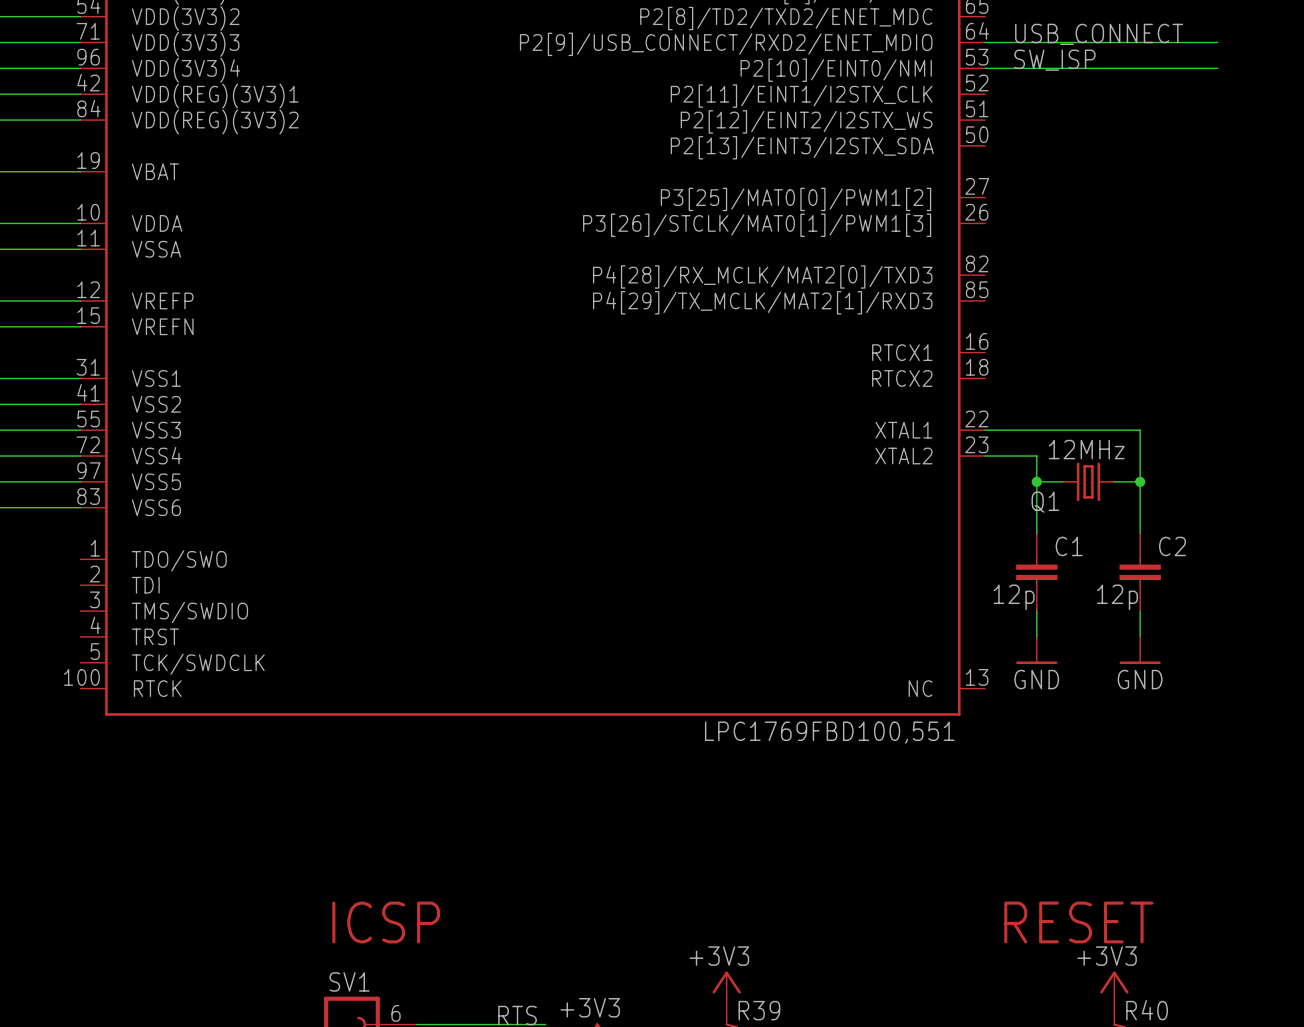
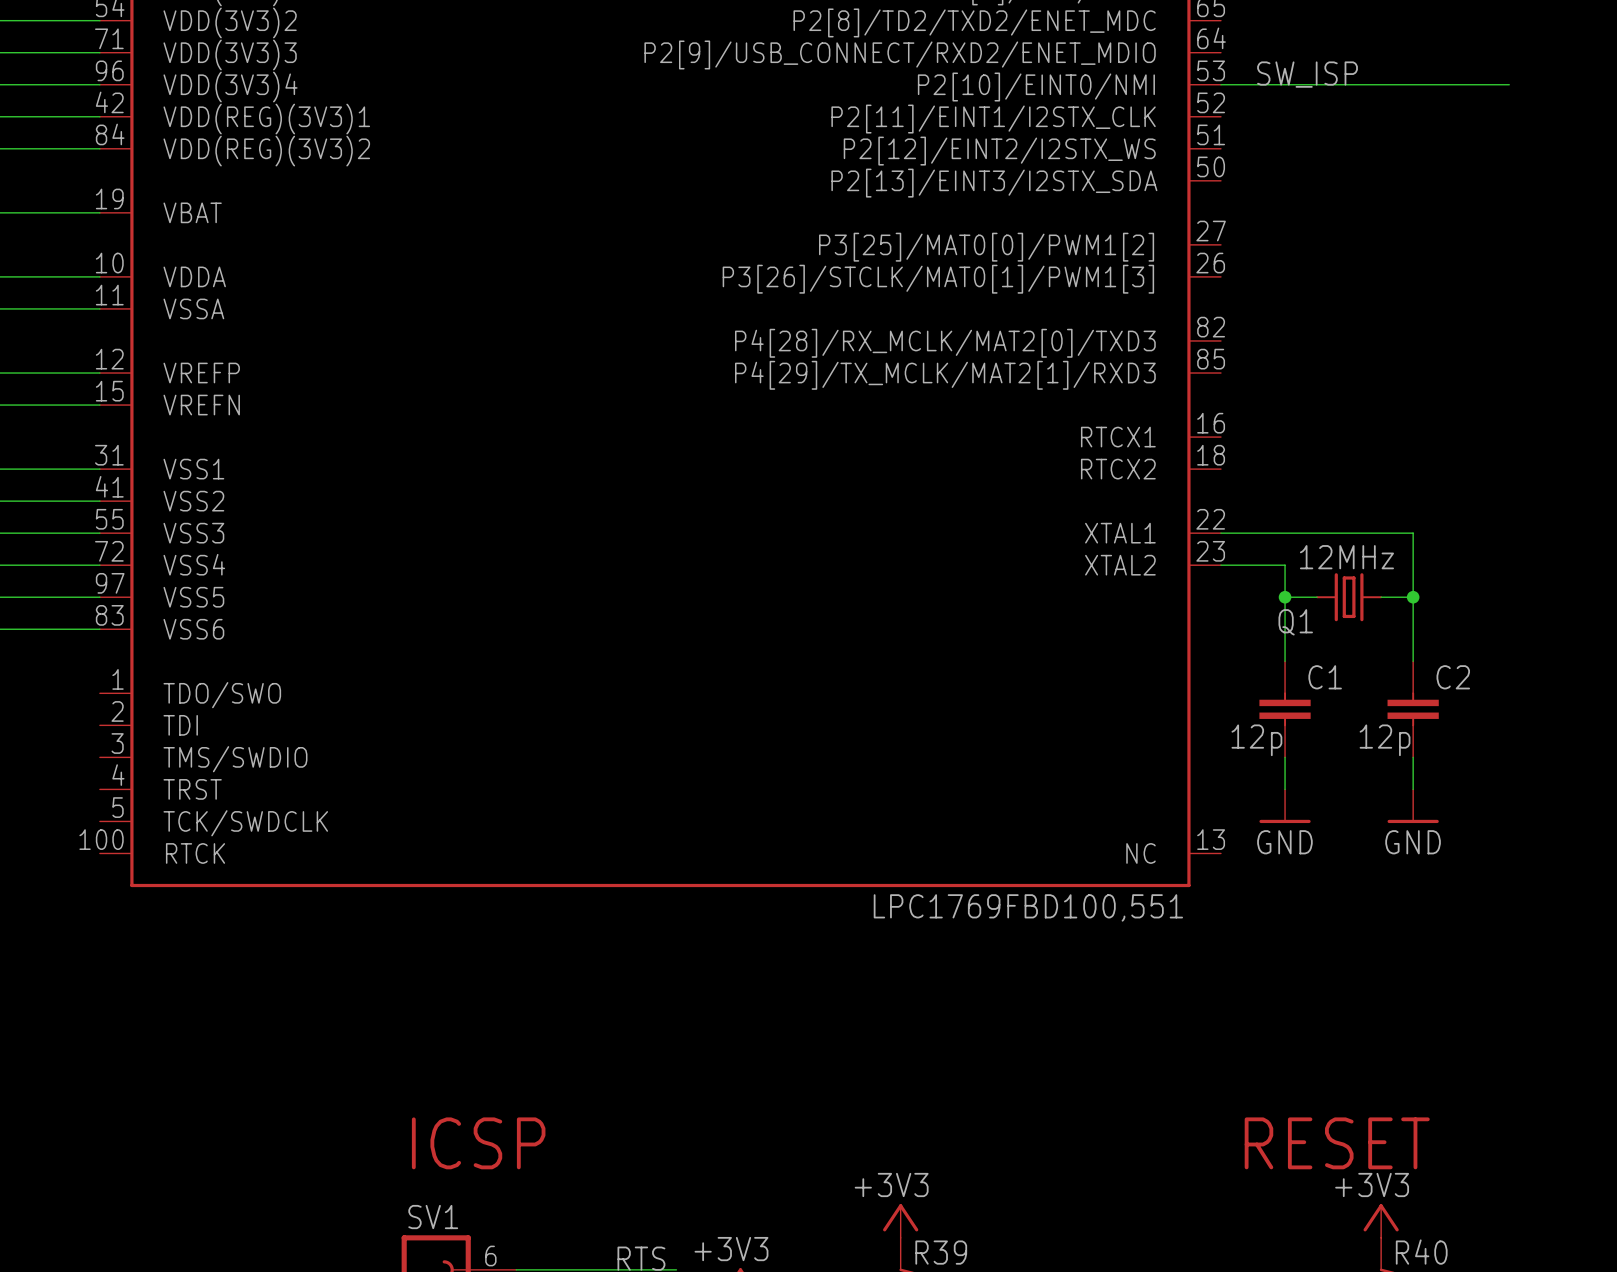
label: USB_CONNECT (1099, 34) -> none
wire: (985, 42) (1217, 42) -> none

